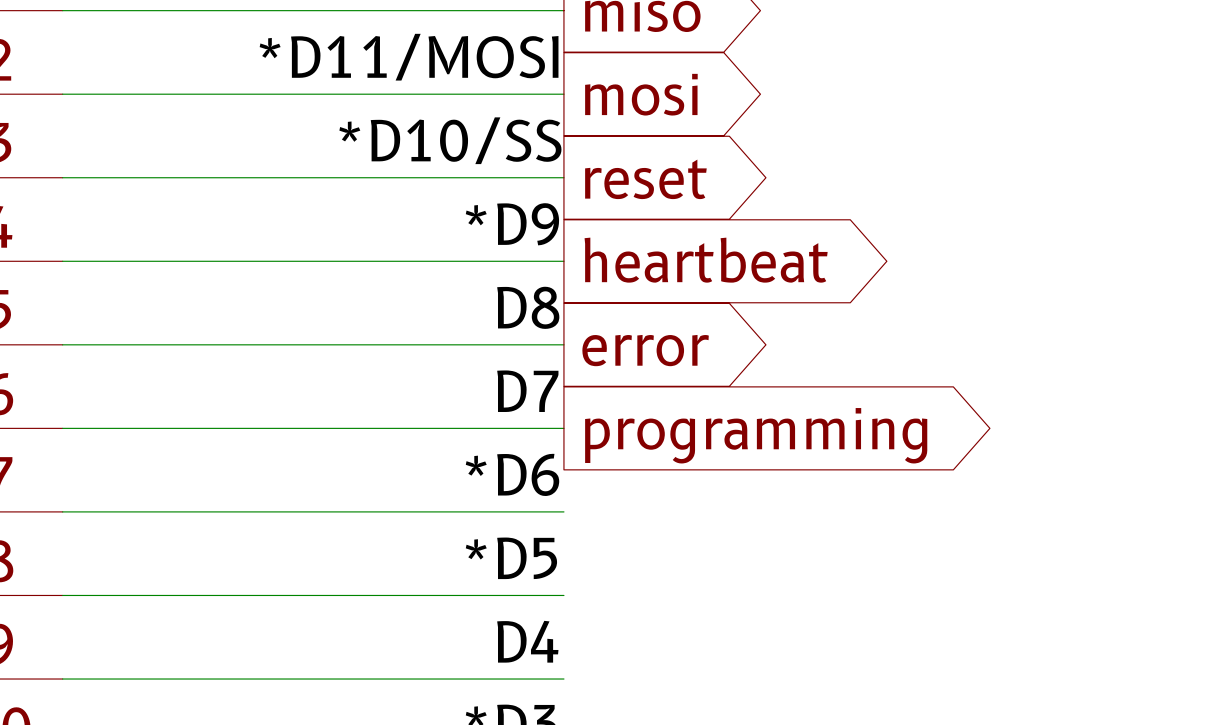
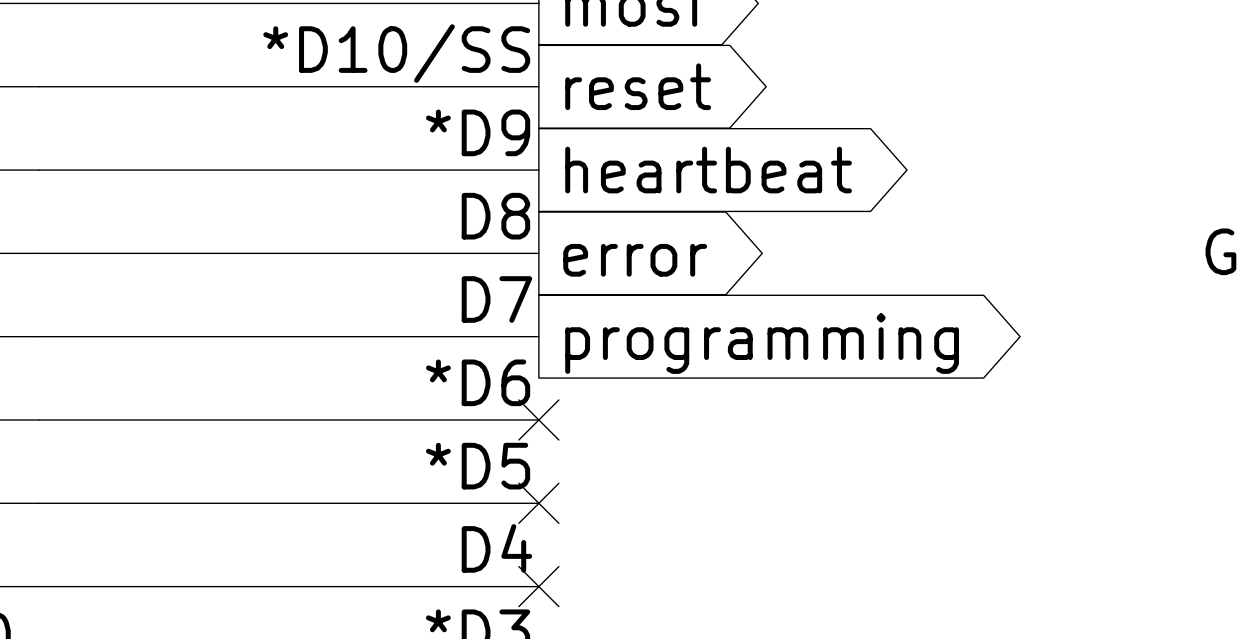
no-connect mark: none -> (538, 419)
no-connect mark: none -> (538, 503)
no-connect mark: none -> (538, 586)

